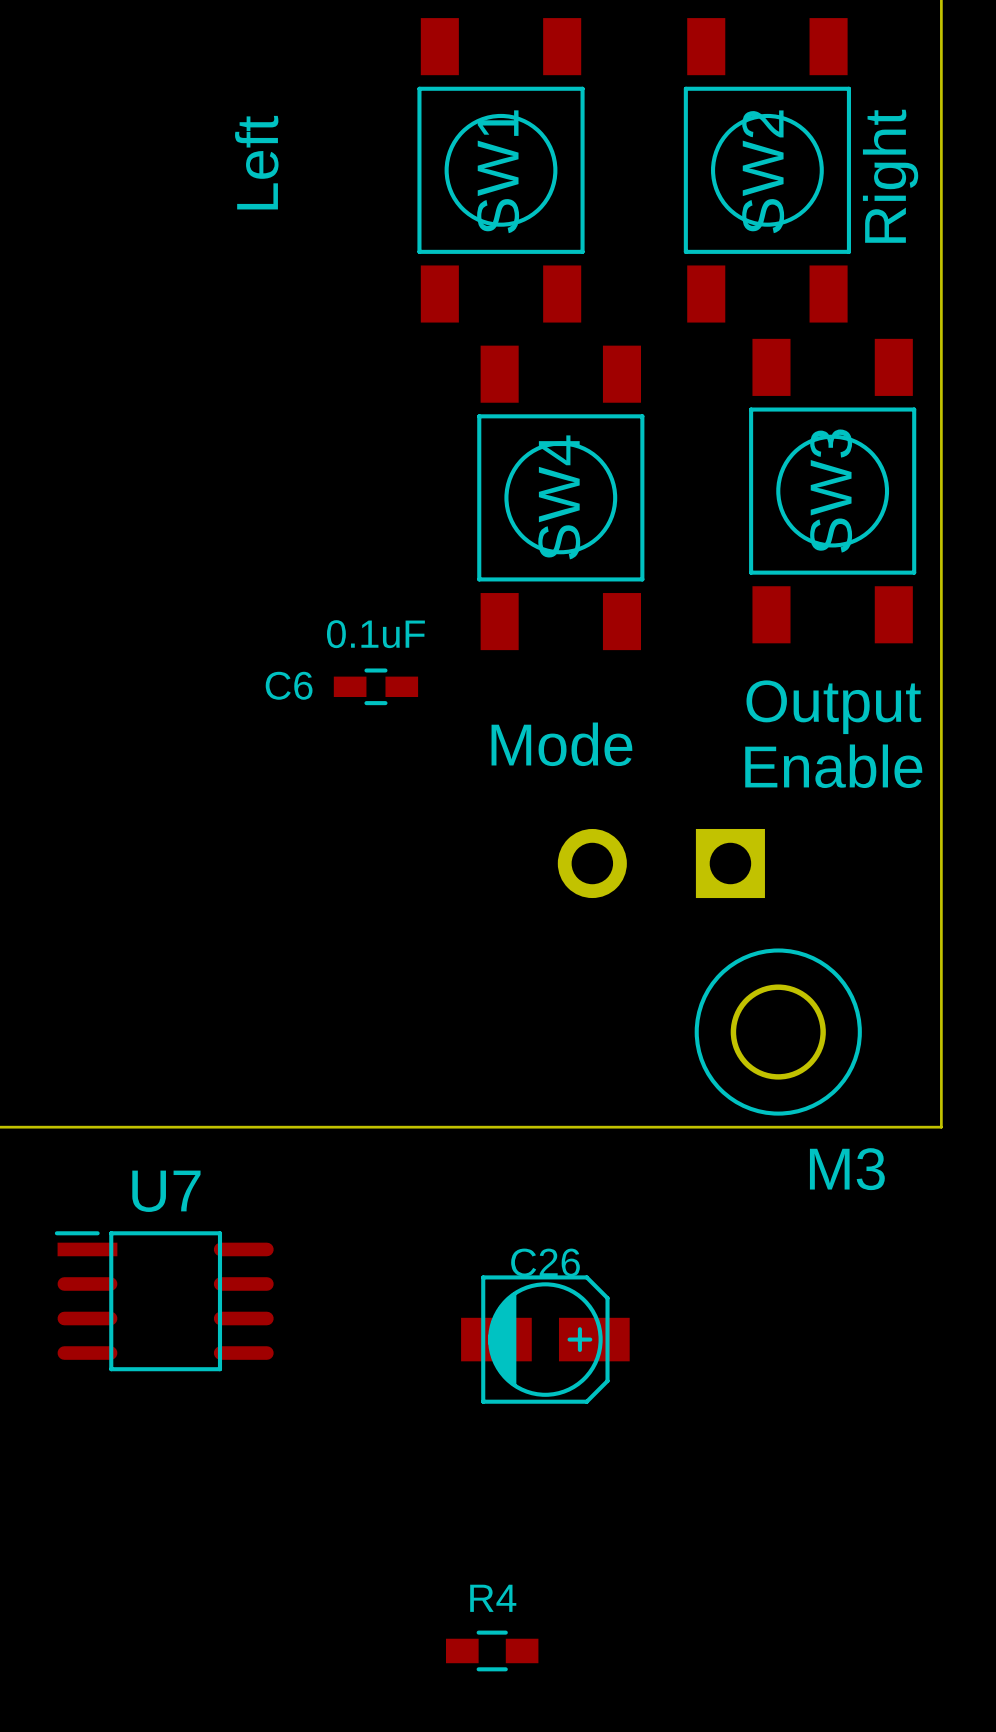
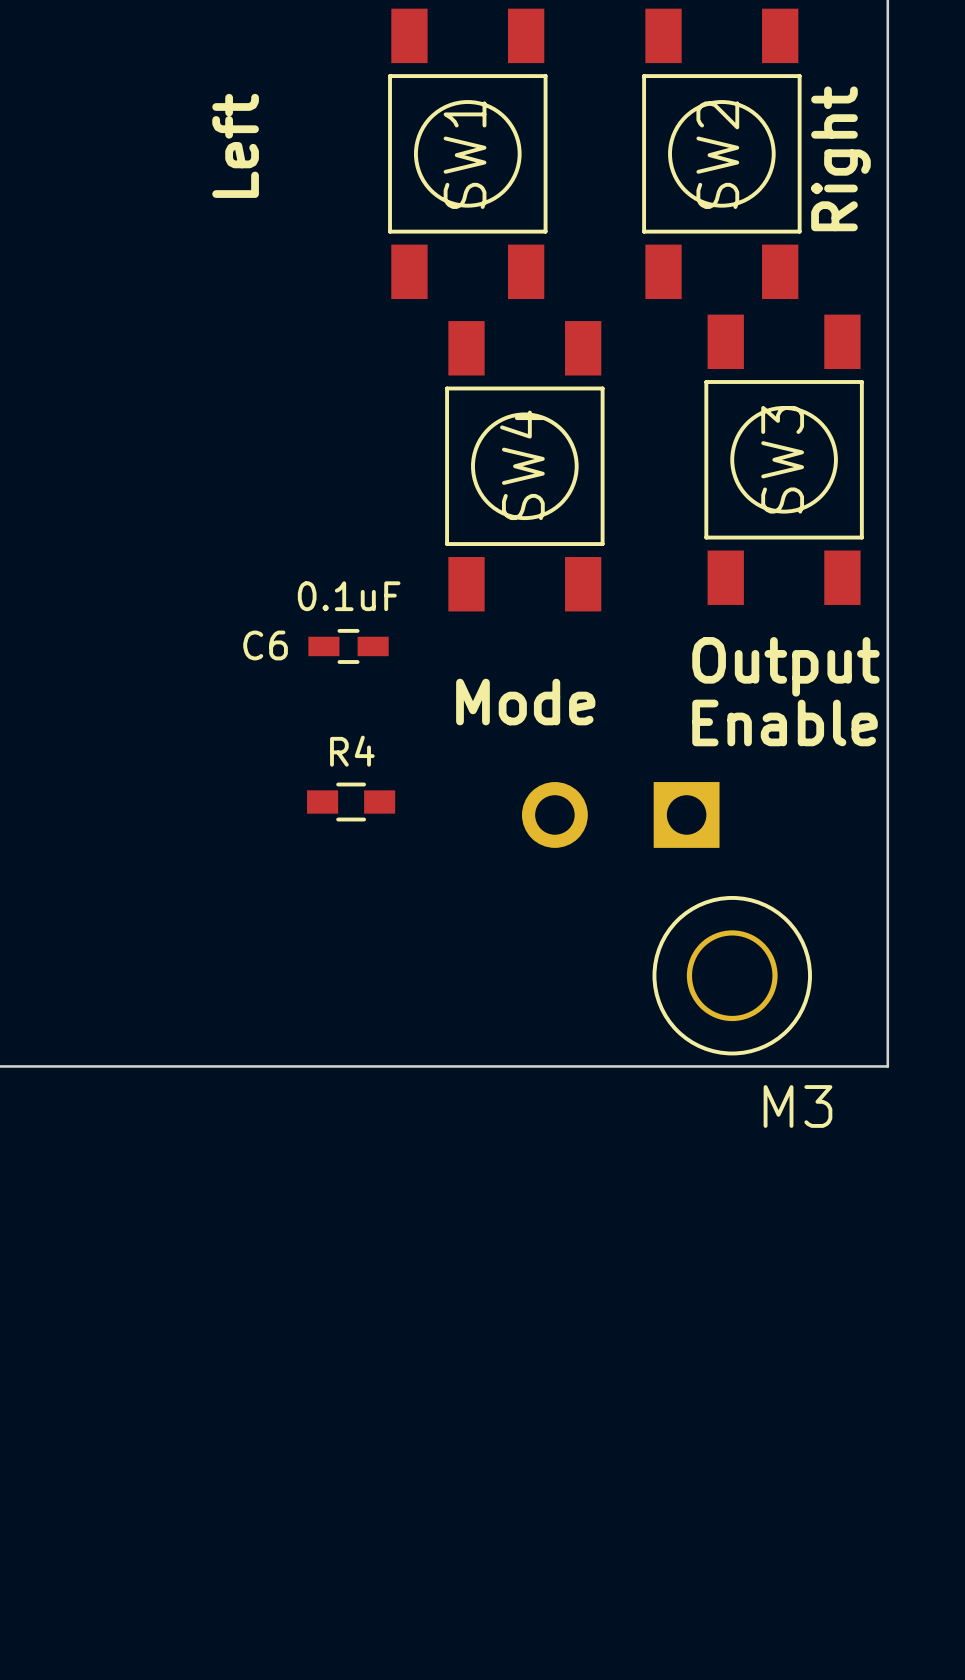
U7: (164, 1301) -> none
C26: (545, 1339) -> none
R4 position: (492, 1650) -> (351, 802)

